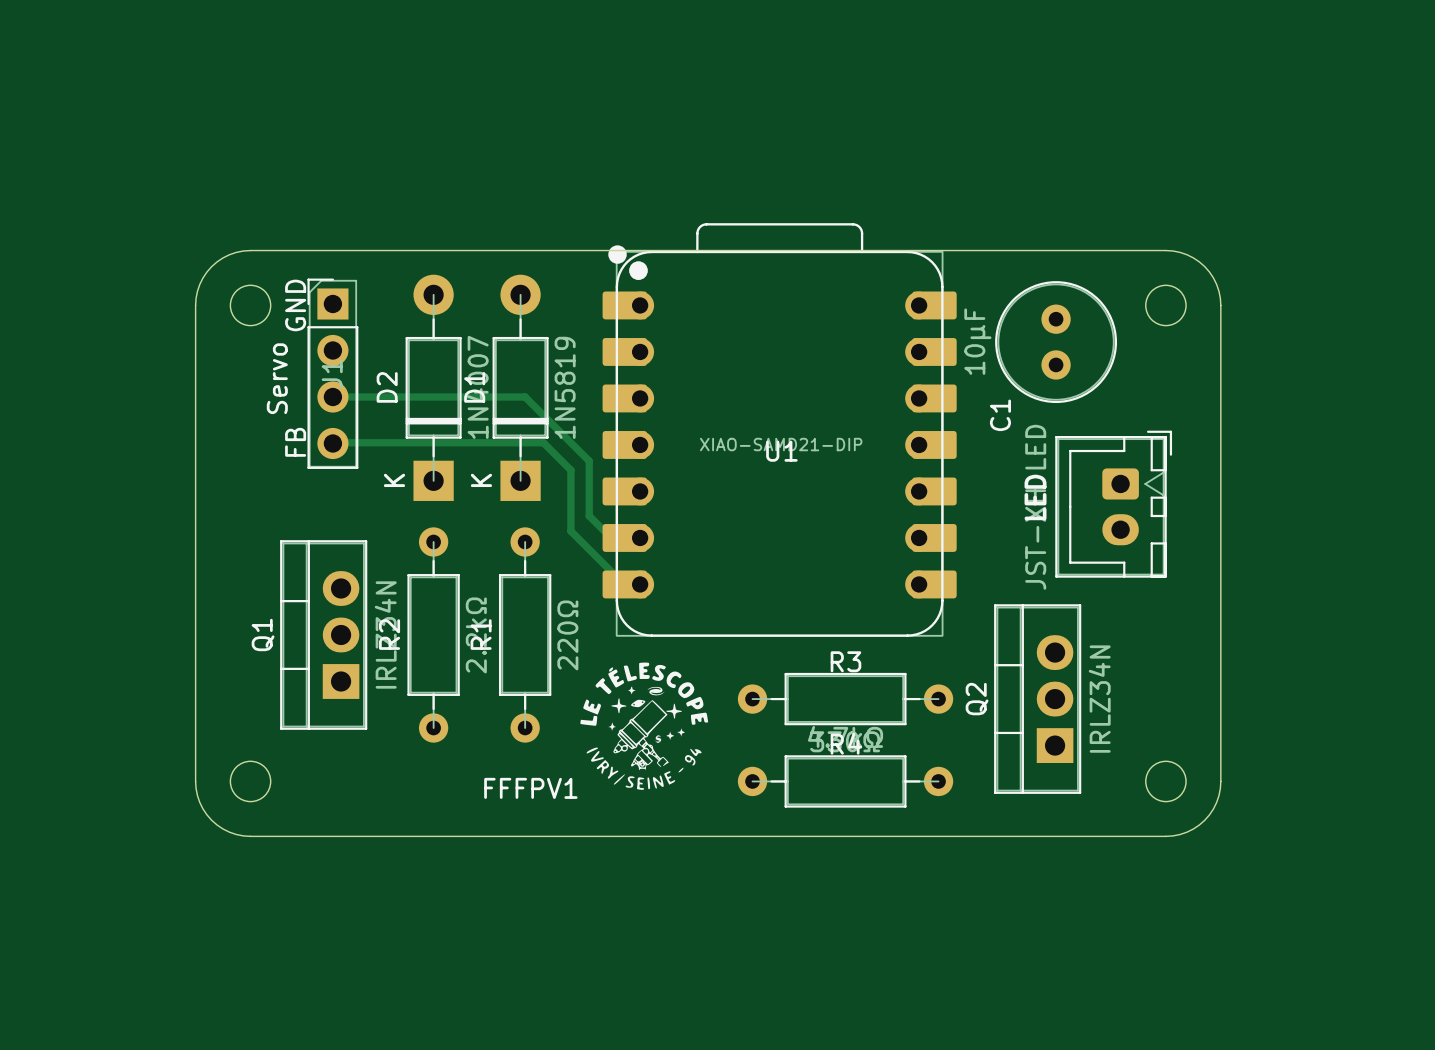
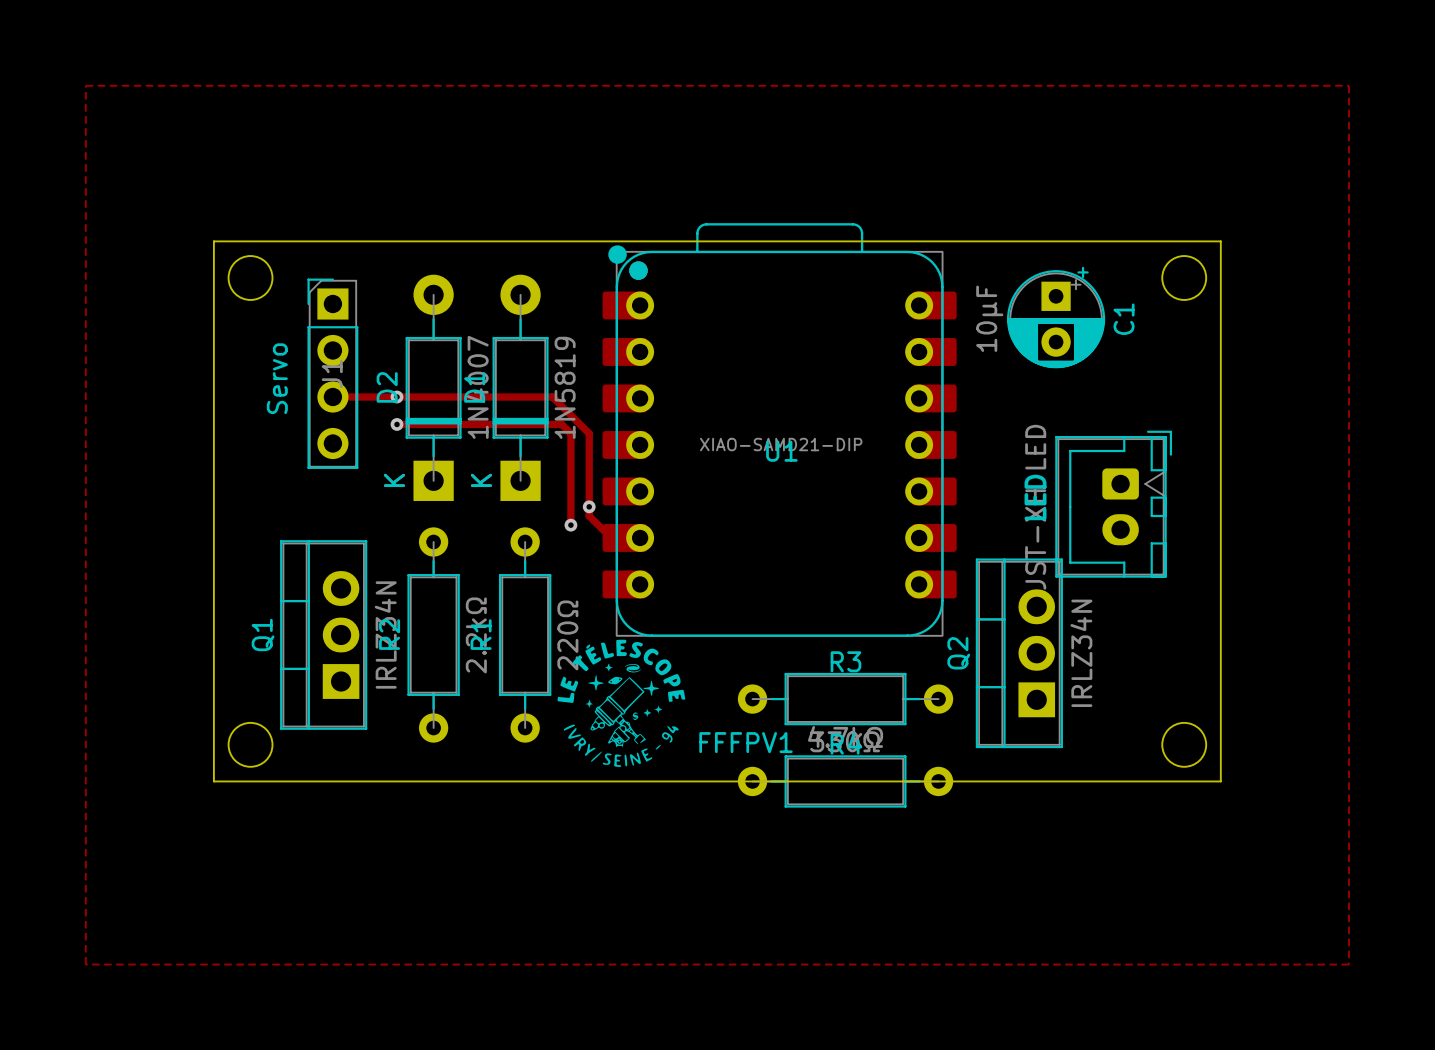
zone outline: none -> (85, 85) (1348, 85) (1348, 964) (85, 964) (85, 85)
round board edge: none -> [228, 255, 273, 301]
round board edge: none -> [1161, 255, 1207, 301]
C1 footprint: [995, 281, 1118, 404] -> [1007, 266, 1106, 369]
round board edge: [229, 284, 272, 327] -> none
round board edge: [1145, 284, 1187, 327] -> none
text: GND (295, 305) -> none
board edge: (1220, 305) (1216, 284) (1204, 266) (1186, 254) (1165, 250) (250, 250) (229, 254) (211, 266) (199, 284) (195, 305) (195, 781) (197, 795) (202, 808) (211, 820) (229, 832) (250, 836) (1165, 836) (1186, 832) (1204, 820) (1216, 802) (1220, 781) -> (1220, 305) (1220, 241) (213, 241) (213, 781) (1220, 781)
via: none -> (397, 397)
track: (525, 397) (589, 461) -> (525, 397) (552, 397) (589, 433) (589, 461)
C1 name position: C1 (1000, 415) -> C1 (1124, 319)
via: none -> (397, 424)
text: FB (295, 442) -> none
track: (332, 443) (543, 442) (570, 470) -> (397, 424) (561, 424) (570, 433) (570, 470)
via: none -> (589, 506)
track: (570, 525) (570, 531) (624, 584) (640, 584) -> none
via: none -> (570, 525)
Q2 position: (1037, 699) -> (1019, 653)
round board edge: none -> [228, 722, 273, 768]
round board edge: none -> [1161, 722, 1207, 768]
drawing position: (644, 726) -> (621, 703)
round board edge: [229, 760, 272, 803] -> none
round board edge: [1145, 760, 1187, 803] -> none
text position: FFFPV1 (530, 788) -> FFFPV1 (745, 742)

